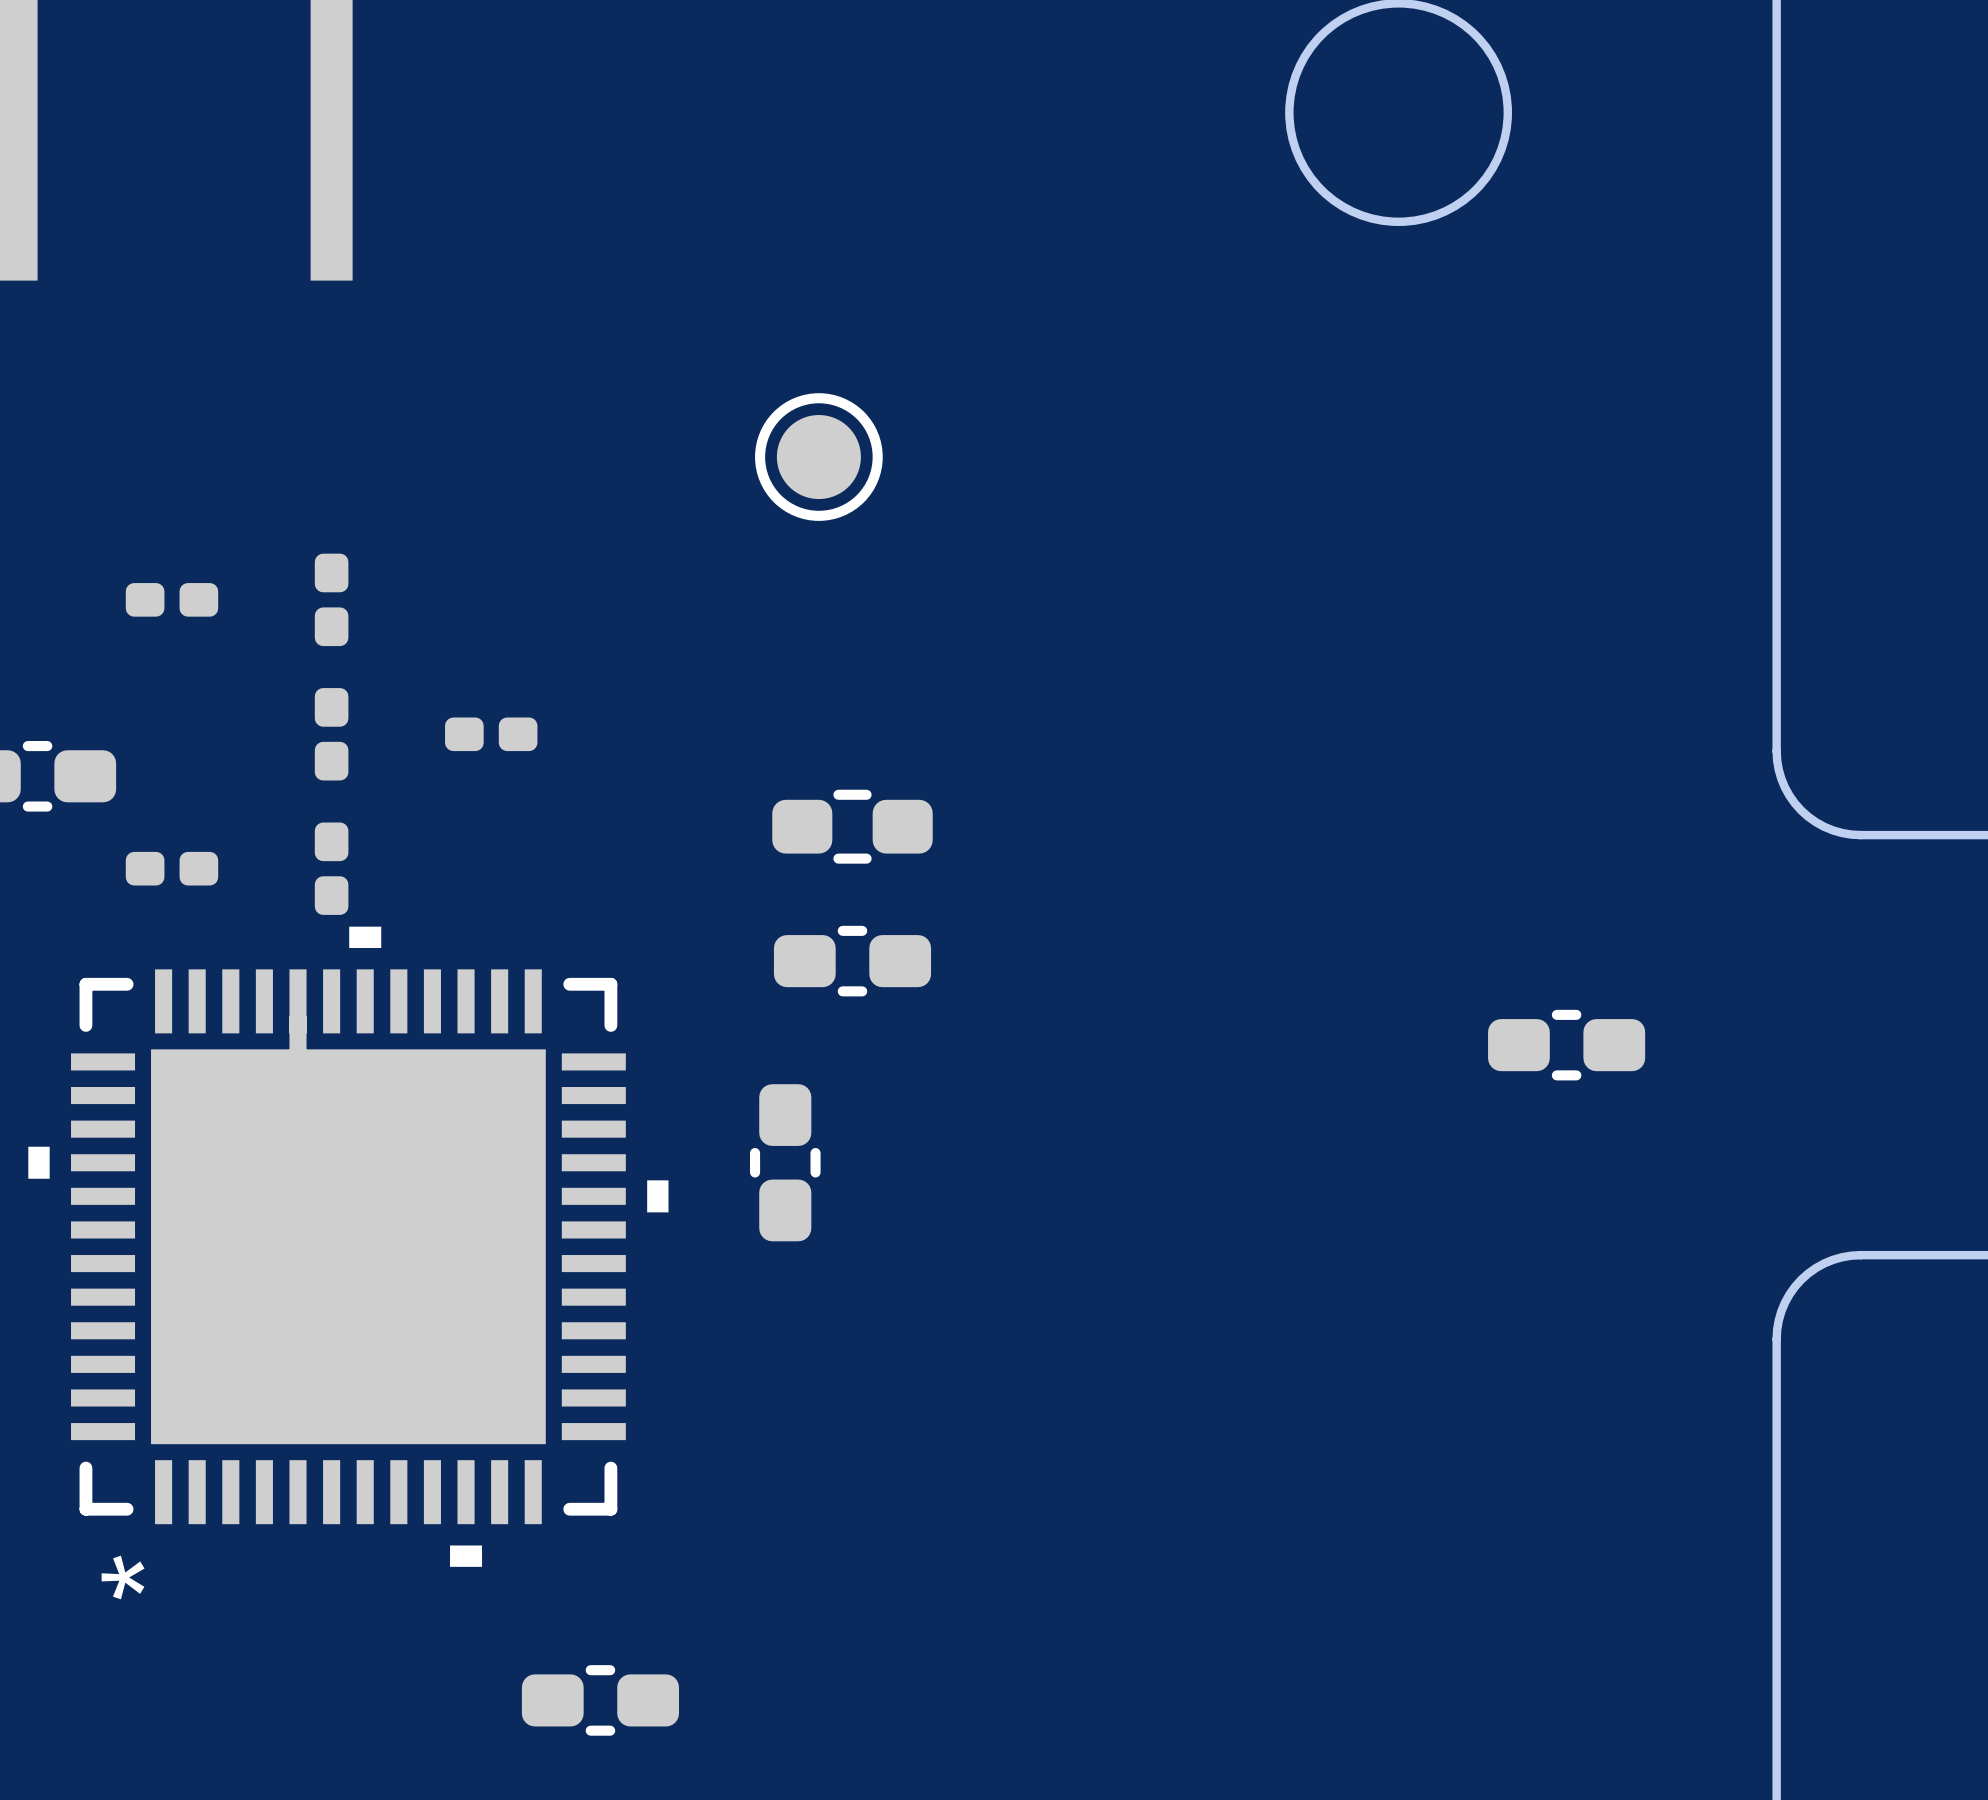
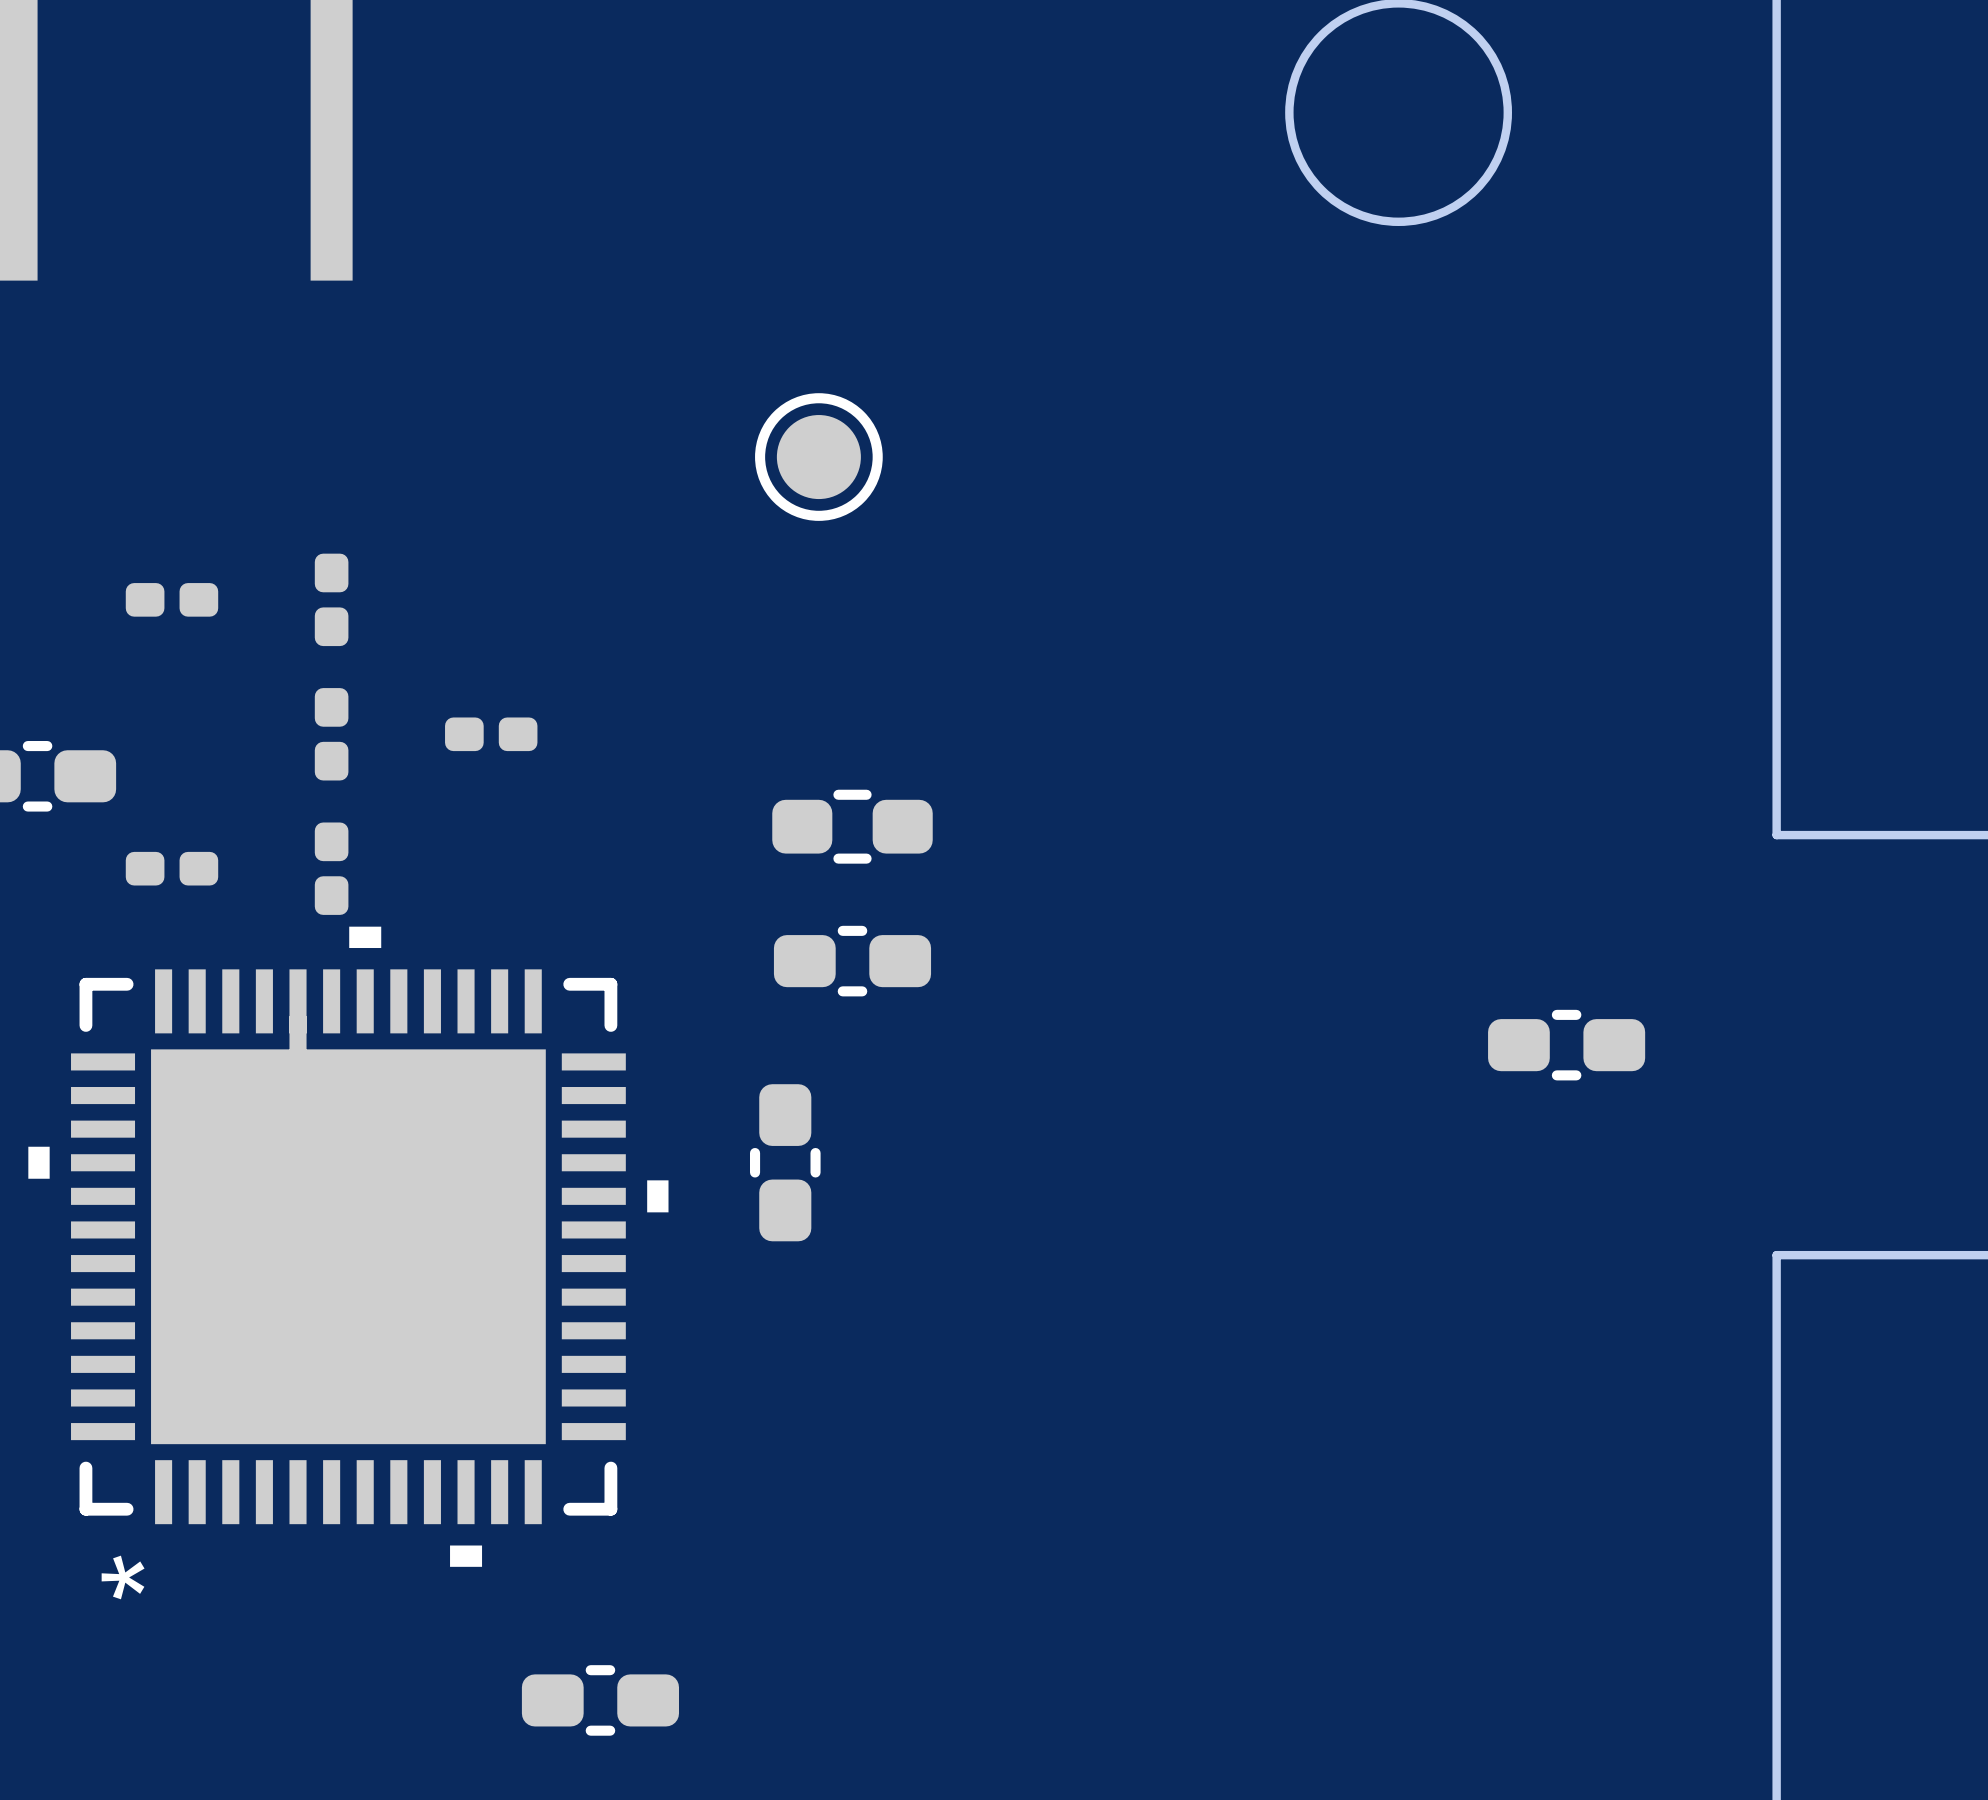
board edge: (1776, 751) (1778, 769) (1784, 787) (1801, 810) (1824, 826) (1841, 832) (1860, 835) -> (1776, 751) (1776, 835) (1860, 835)
board edge: (1860, 1255) (1832, 1259) (1815, 1268) (1801, 1279) (1784, 1302) (1778, 1320) (1776, 1339) -> (1860, 1255) (1776, 1255) (1776, 1339)

